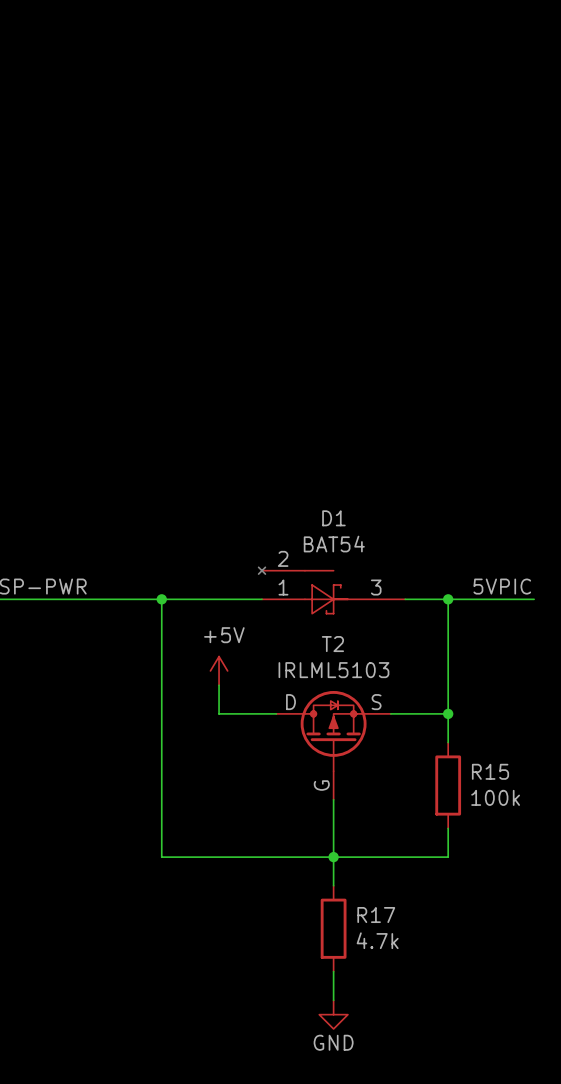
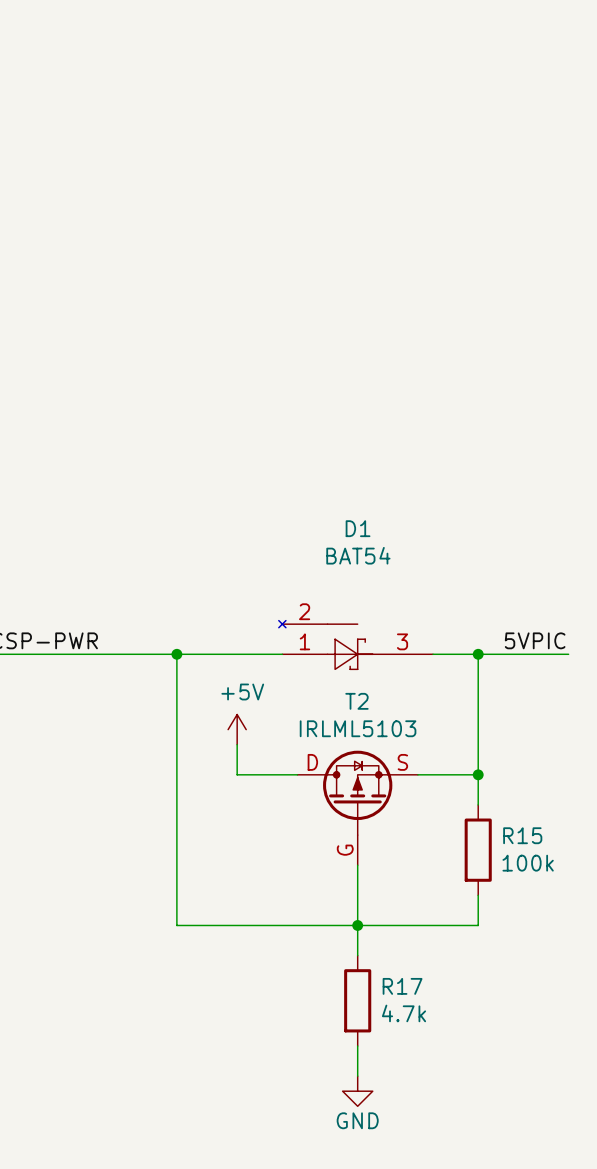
D1 name position: D1 (333, 518) -> D1 (358, 528)
D1 value position: BAT54 (334, 544) -> BAT54 (358, 555)

